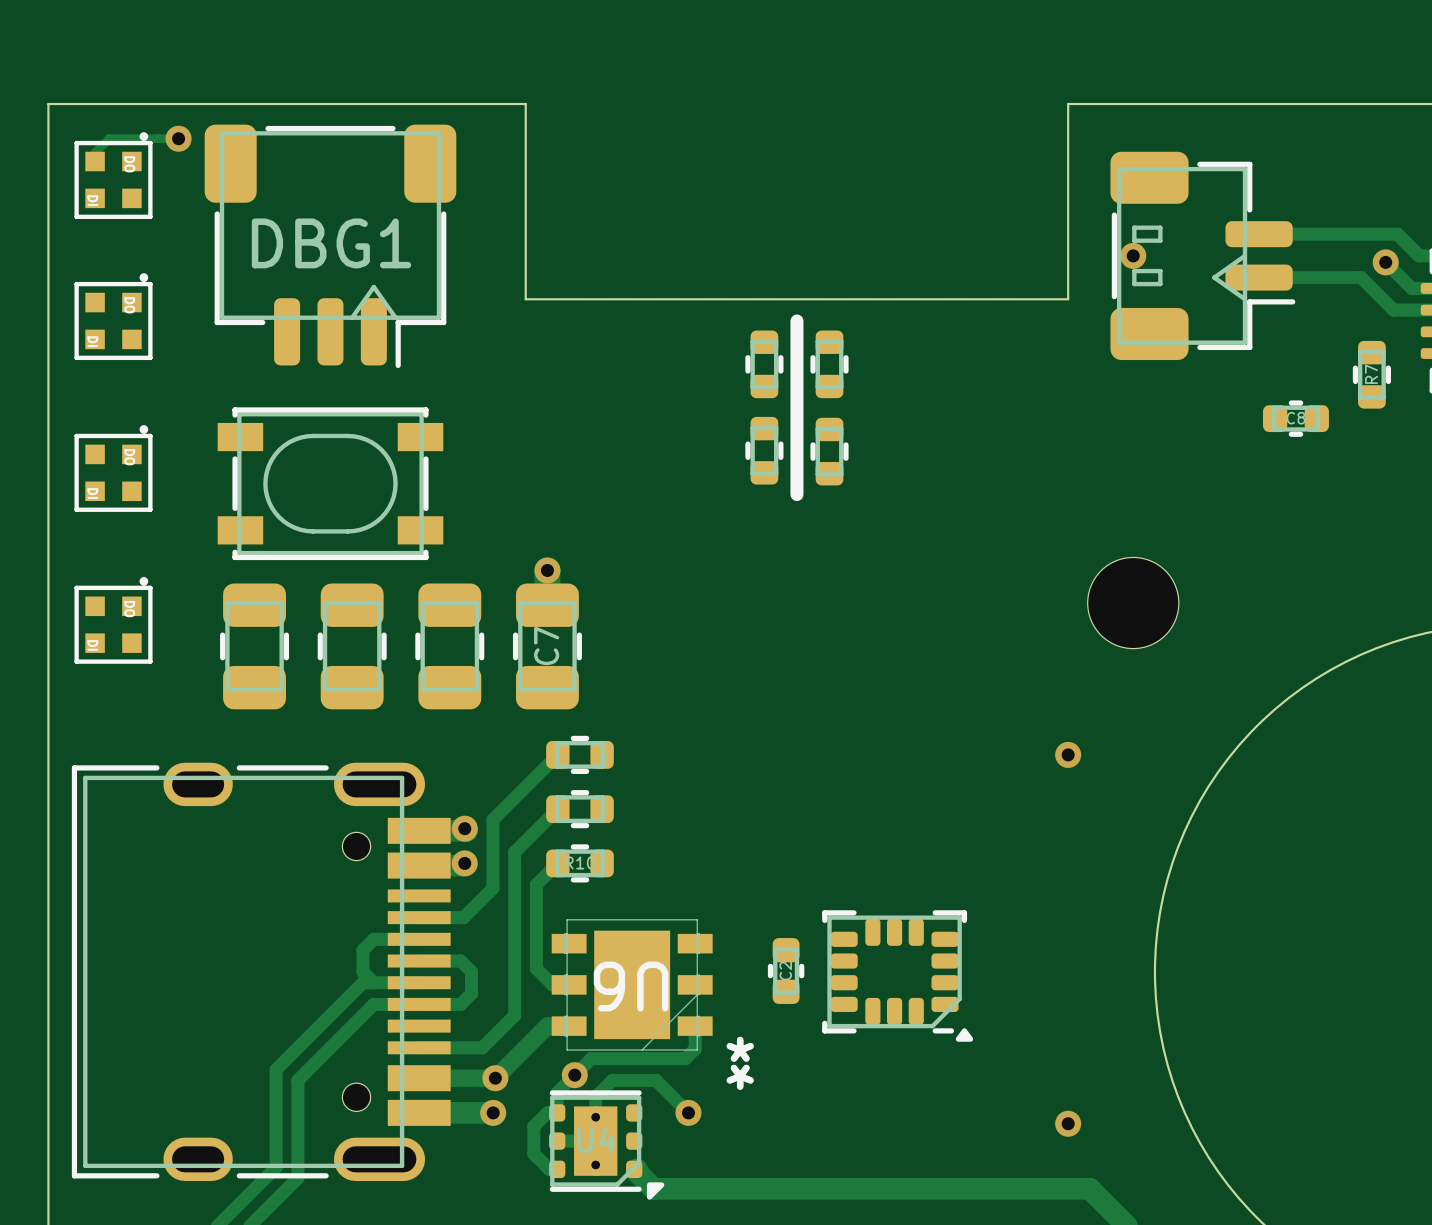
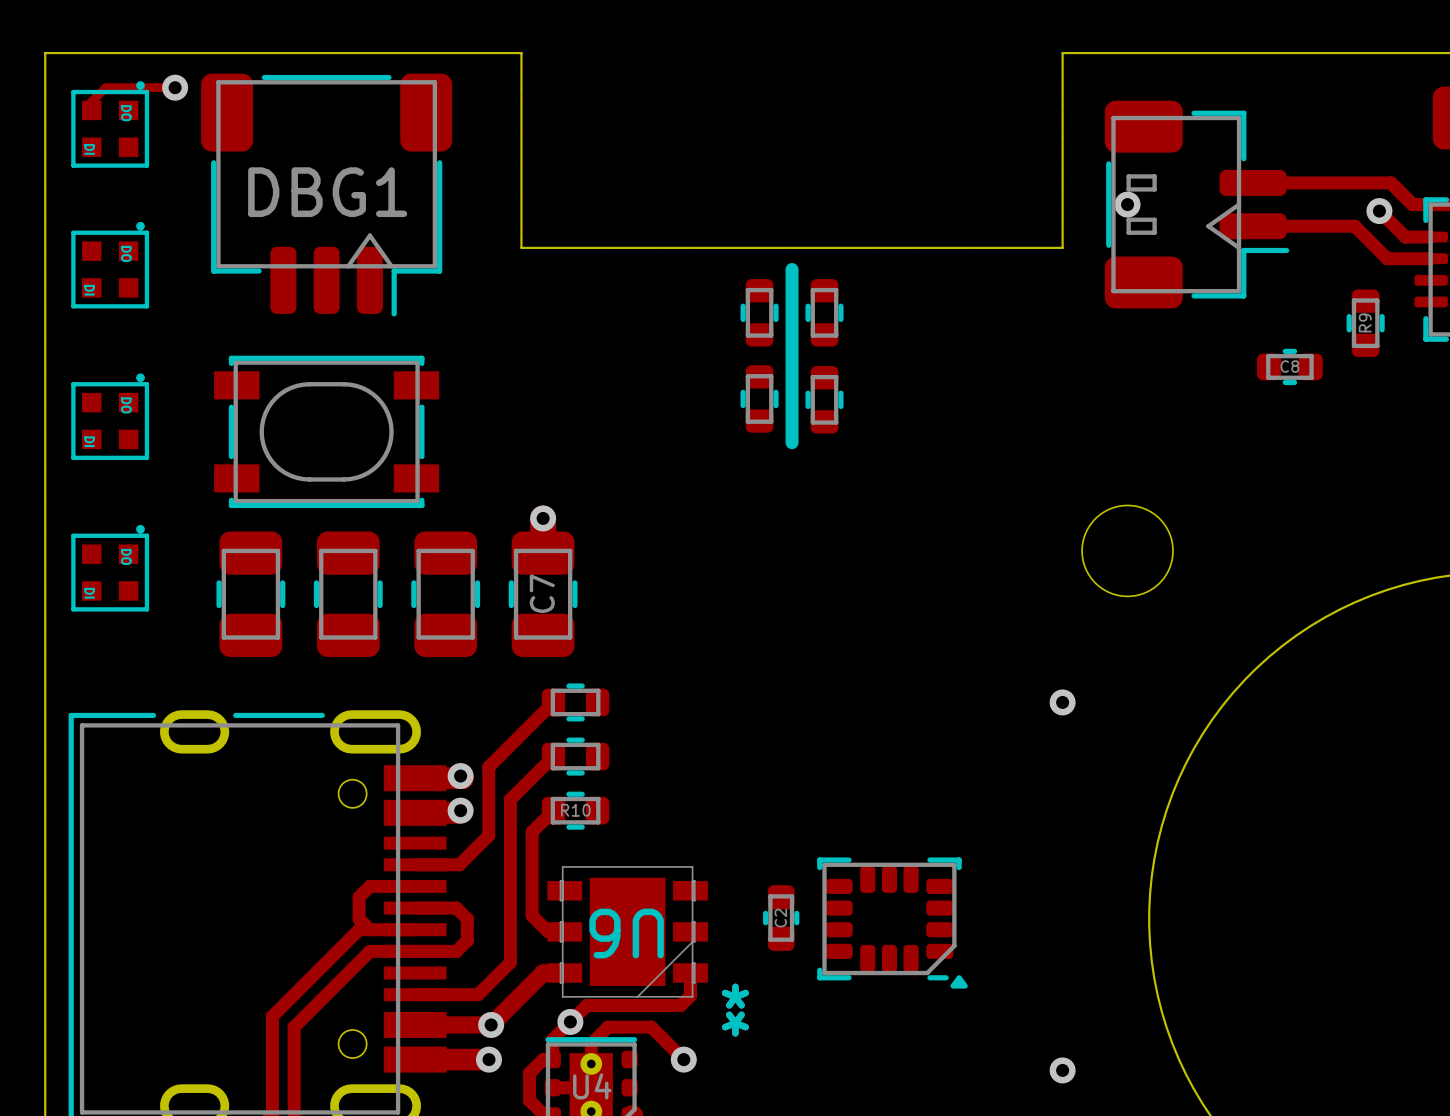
R7 name: R7 (1371, 374) -> R9 (1365, 322)

